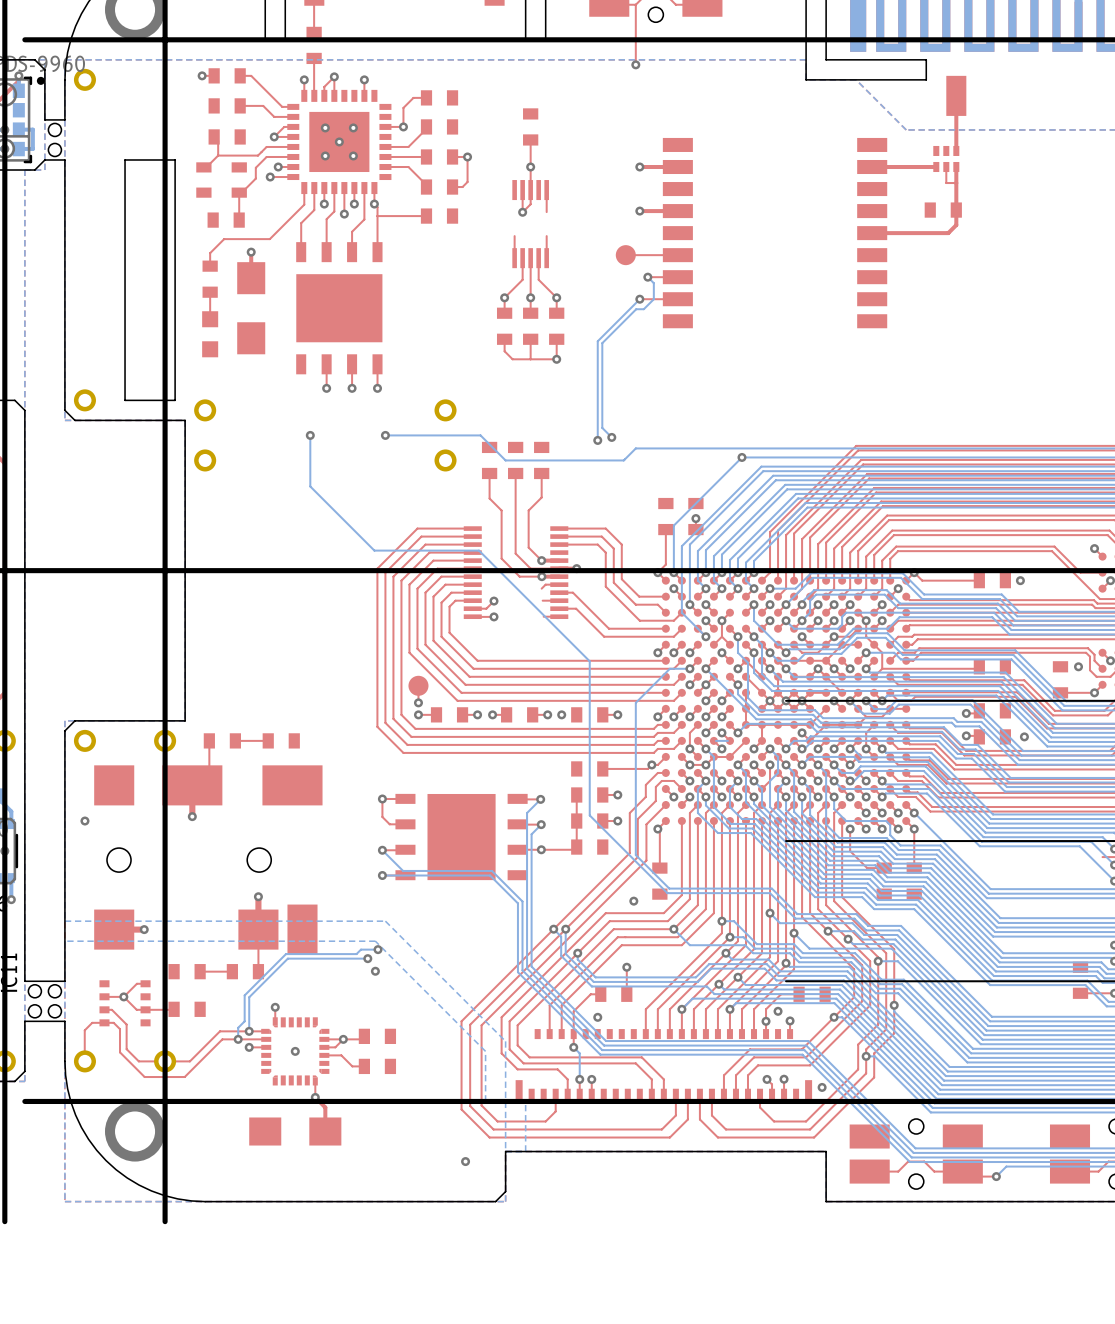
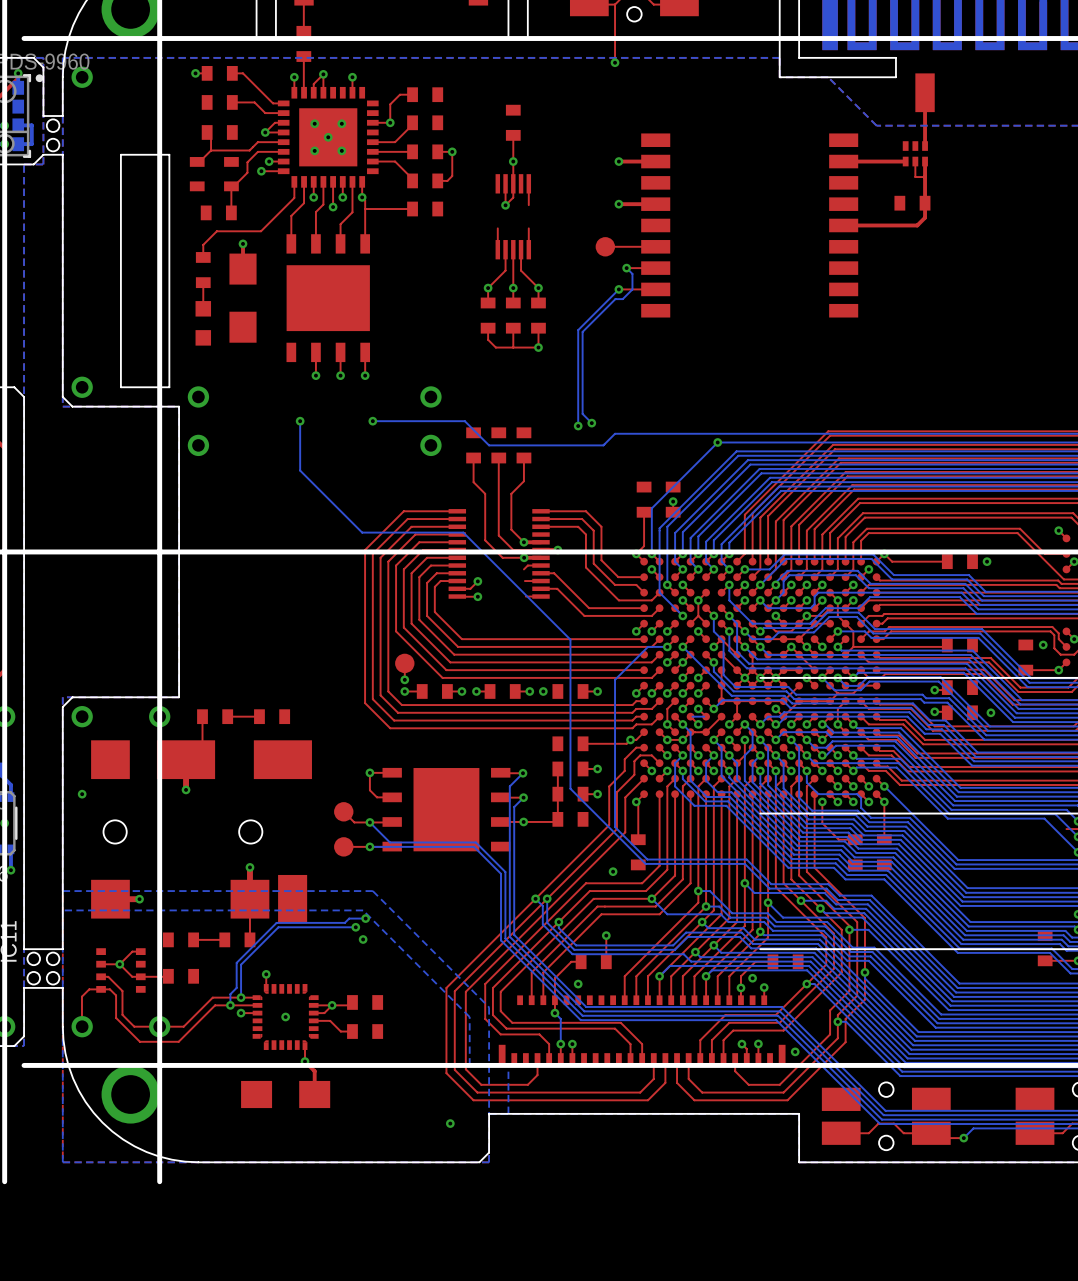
top track: none -> (343, 811) (354, 822) (369, 822)
part: none -> (343, 811)
part: none -> (343, 846)
top track: none -> (369, 846) (343, 846)

